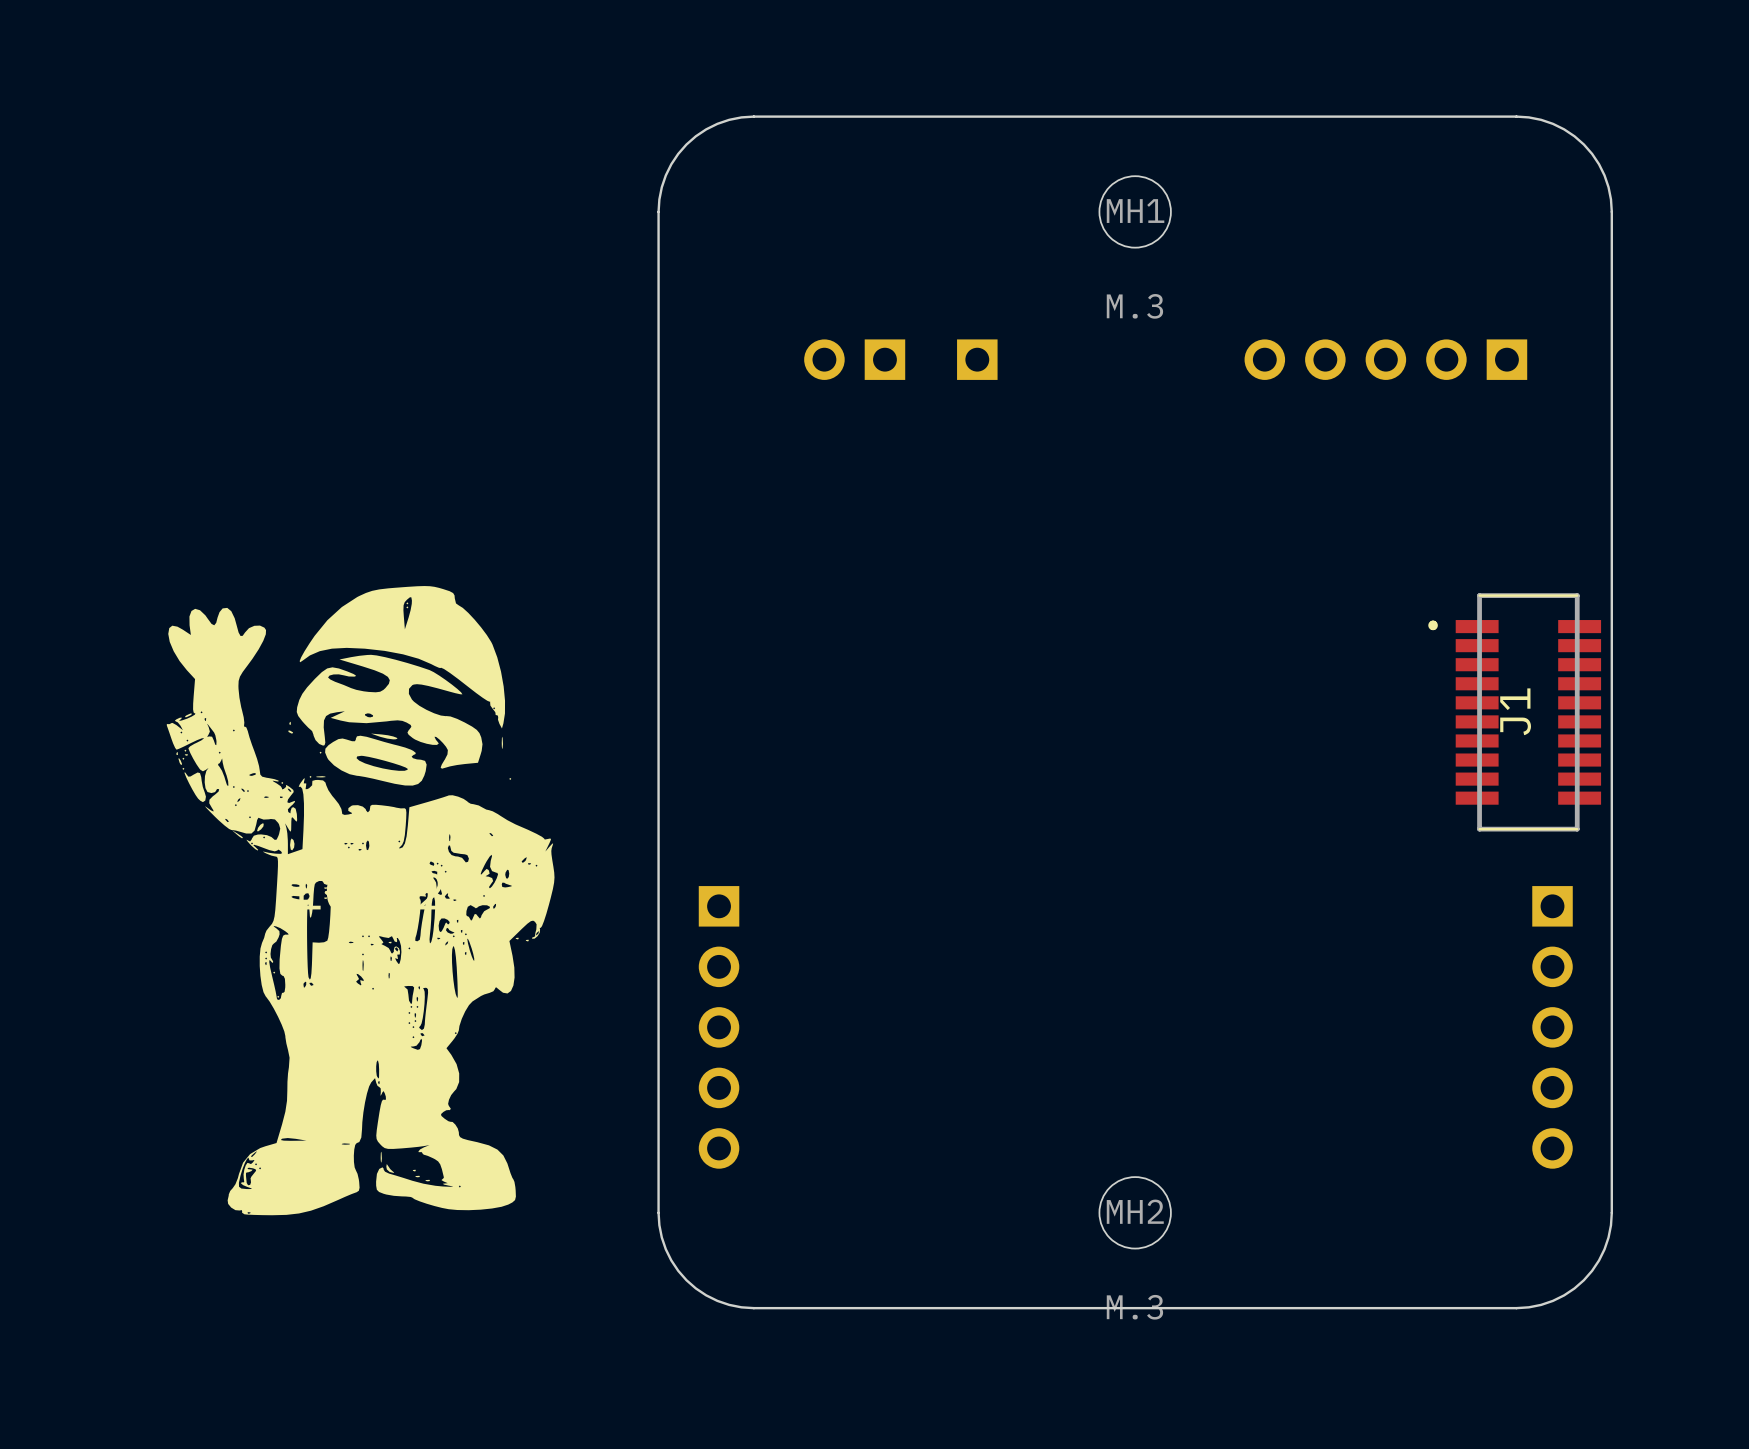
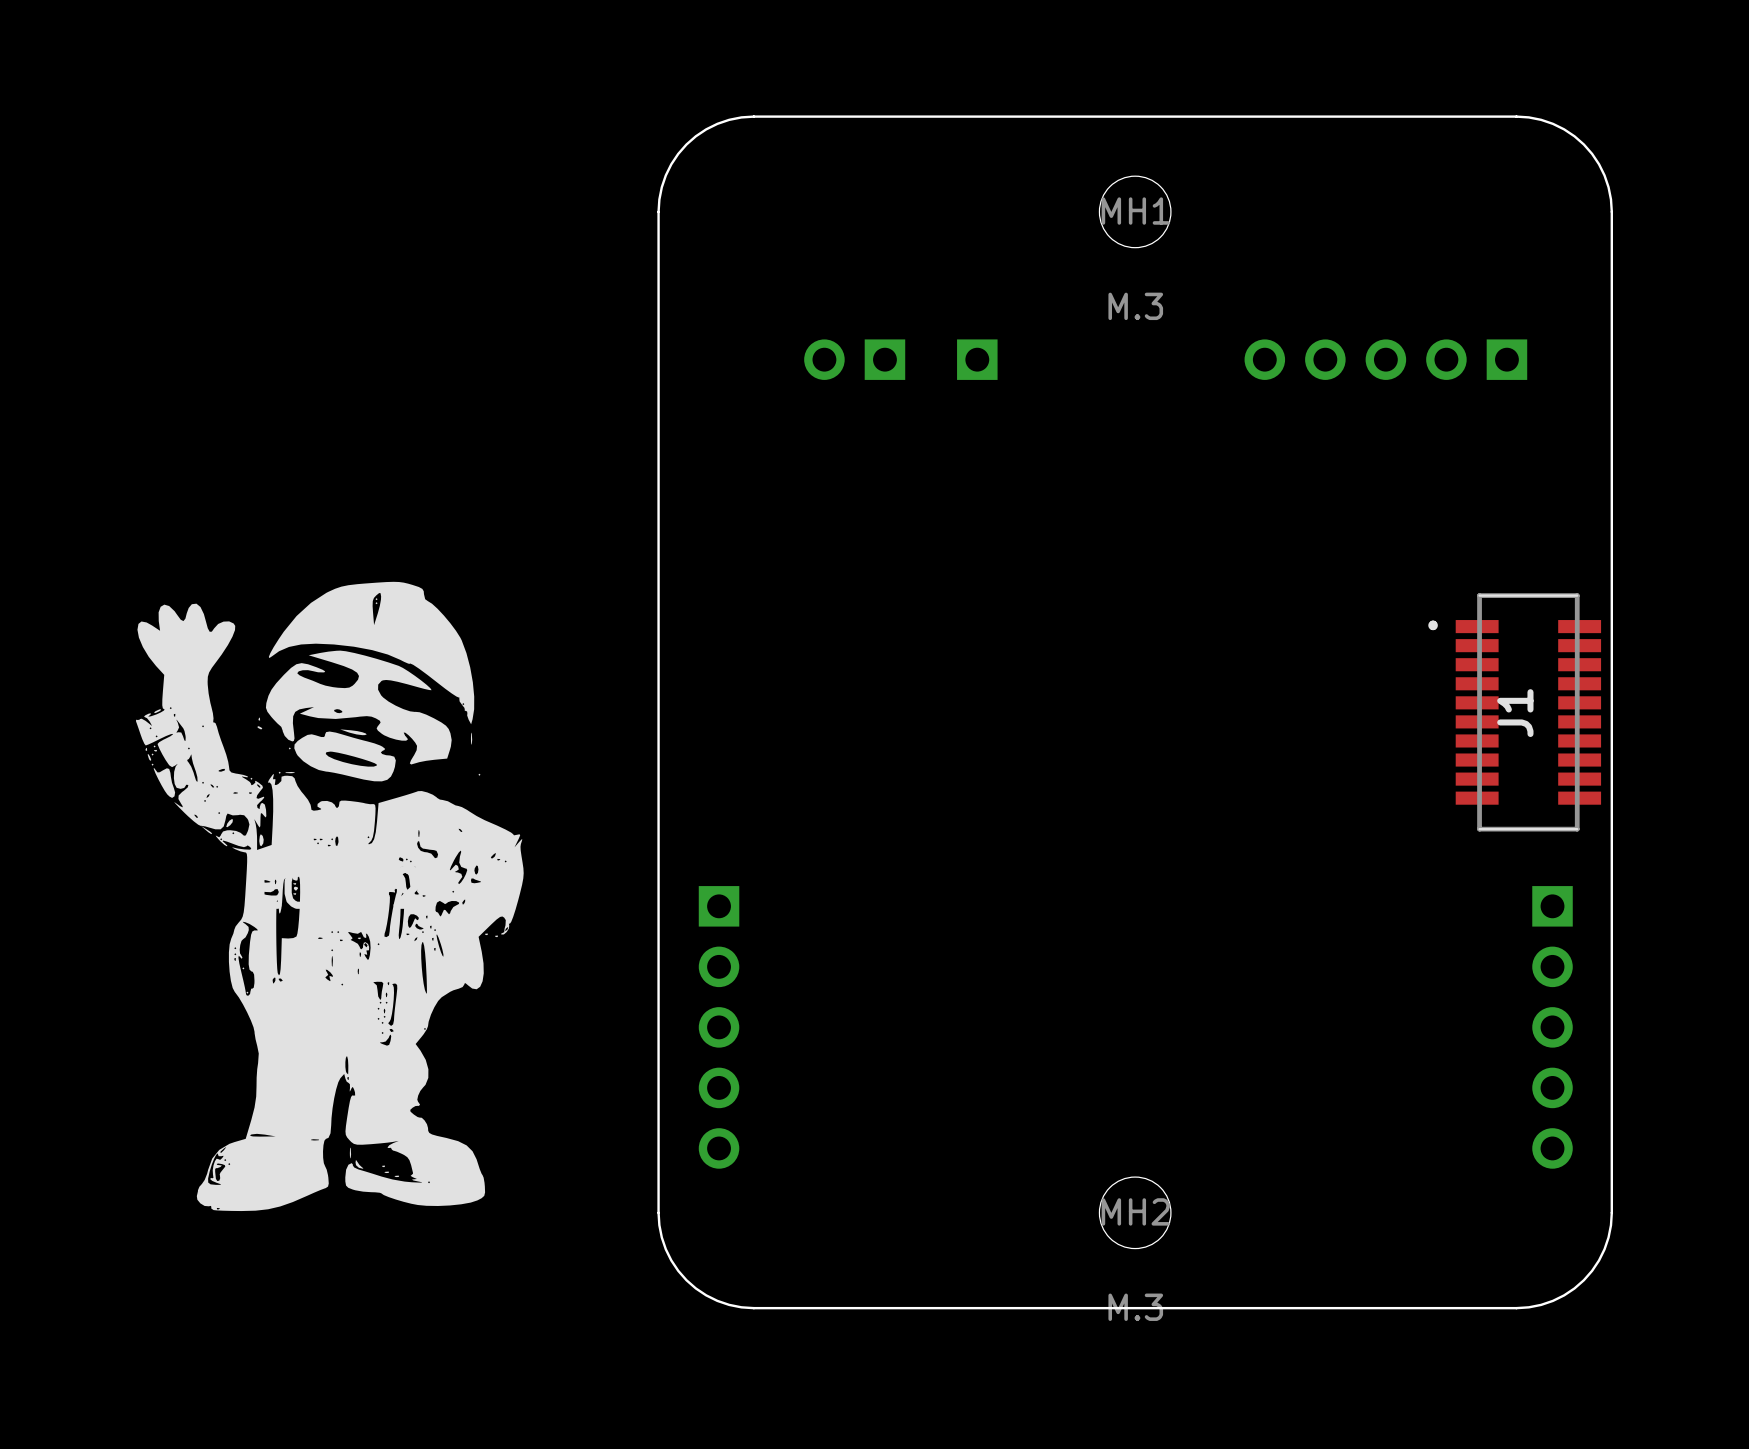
part position: (360, 900) -> (329, 896)

